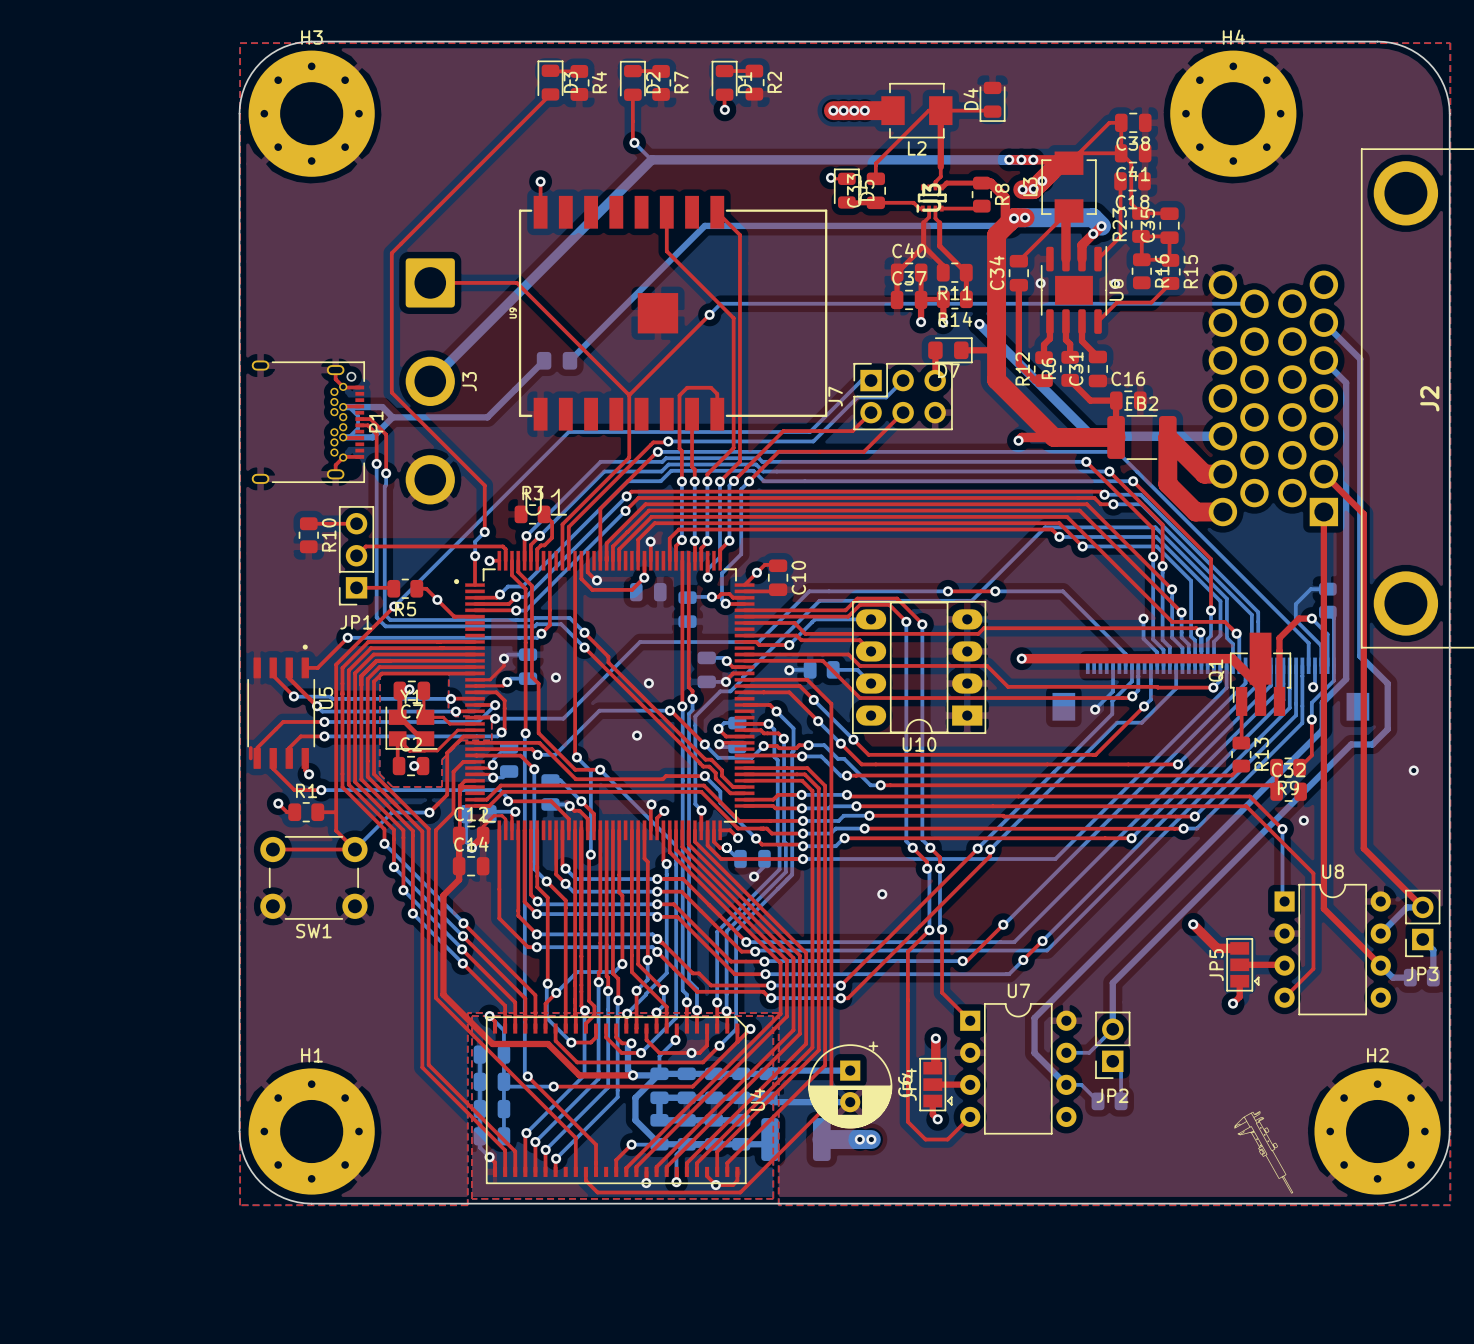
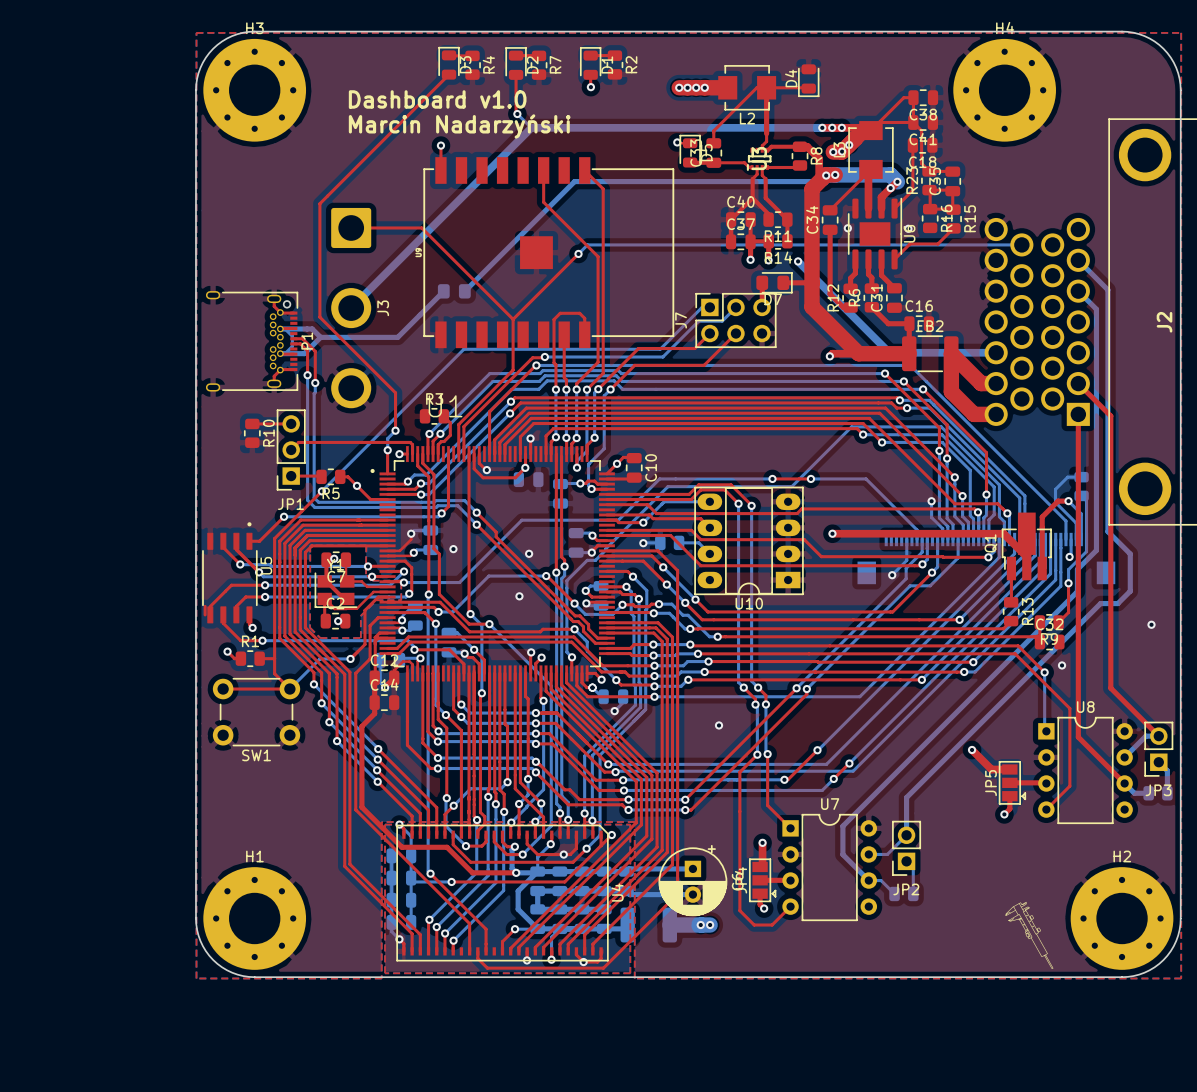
text: none -> Dashboard v1.0 (437, 99)
text: none -> Marcin Nadarzyński (459, 126)

